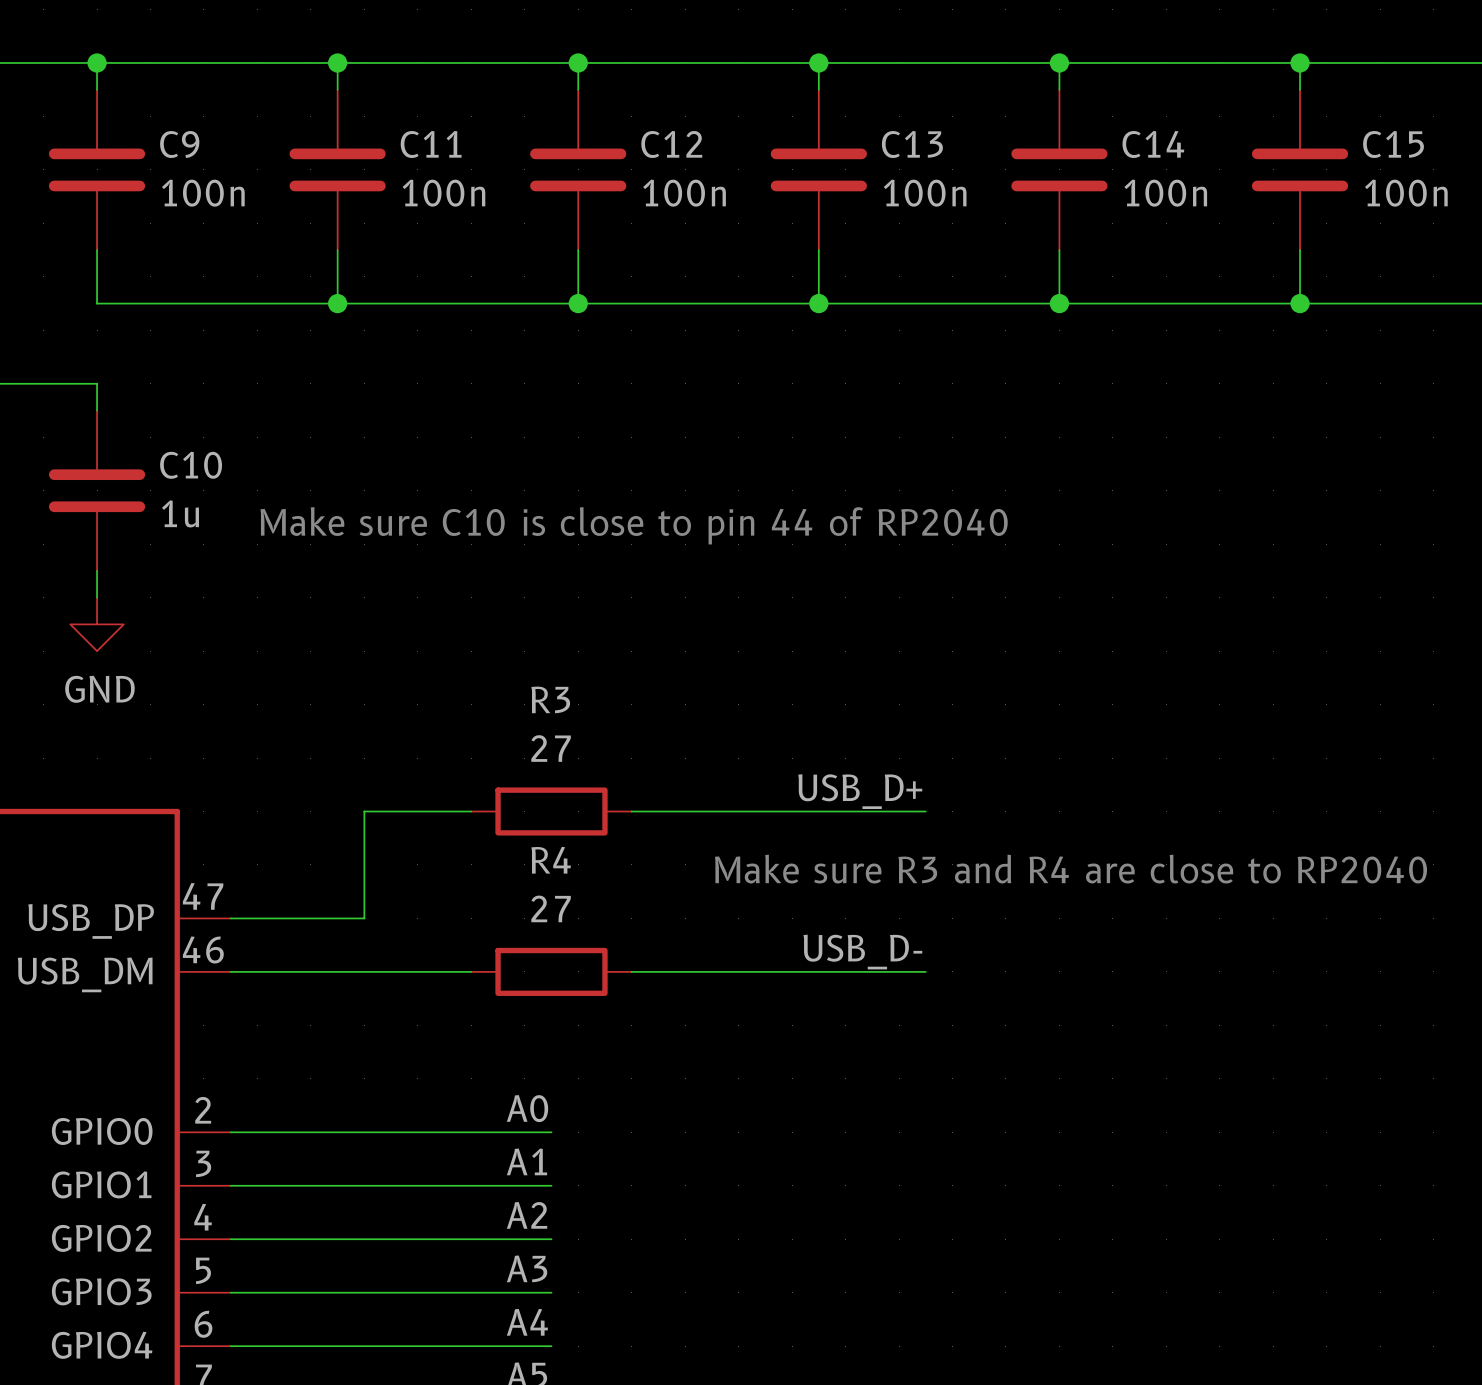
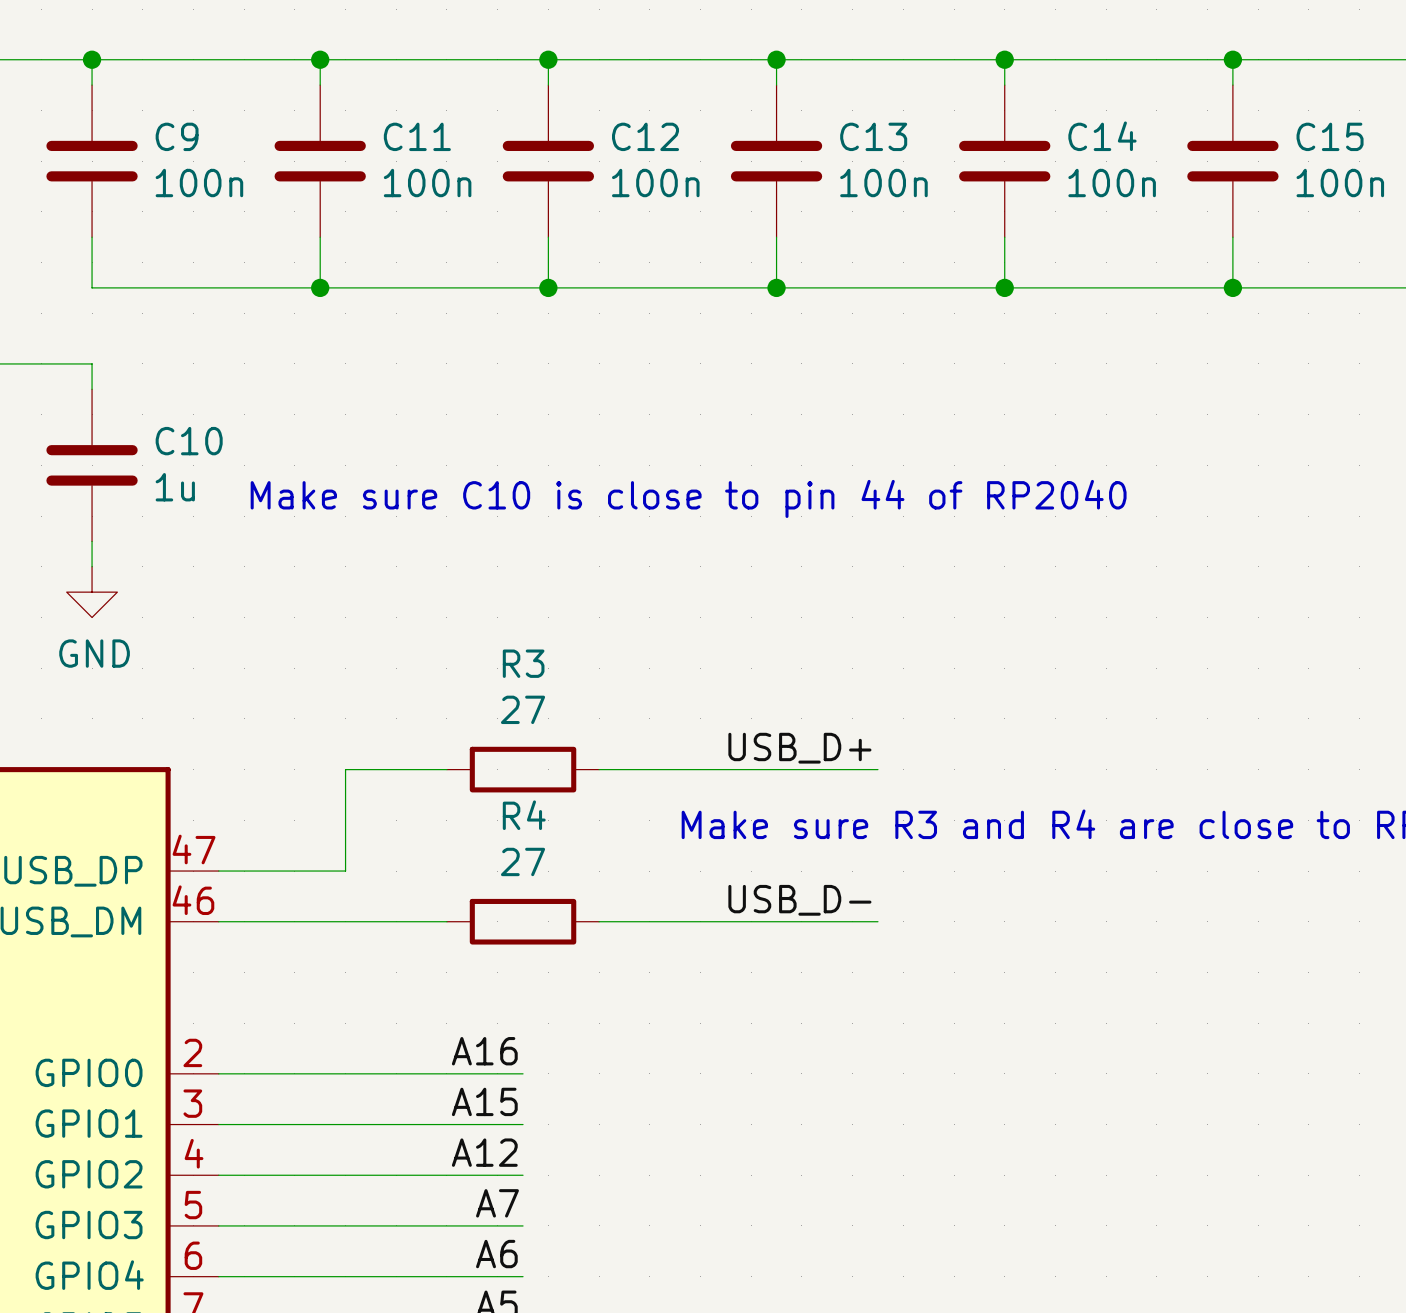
label: A0 (527, 1108) -> A16 (484, 1051)
label: A1 (526, 1161) -> A15 (484, 1101)
label: A2 (527, 1215) -> A12 (484, 1152)
label: A3 (527, 1268) -> A7 (497, 1203)
label: A4 (527, 1322) -> A6 (496, 1254)

